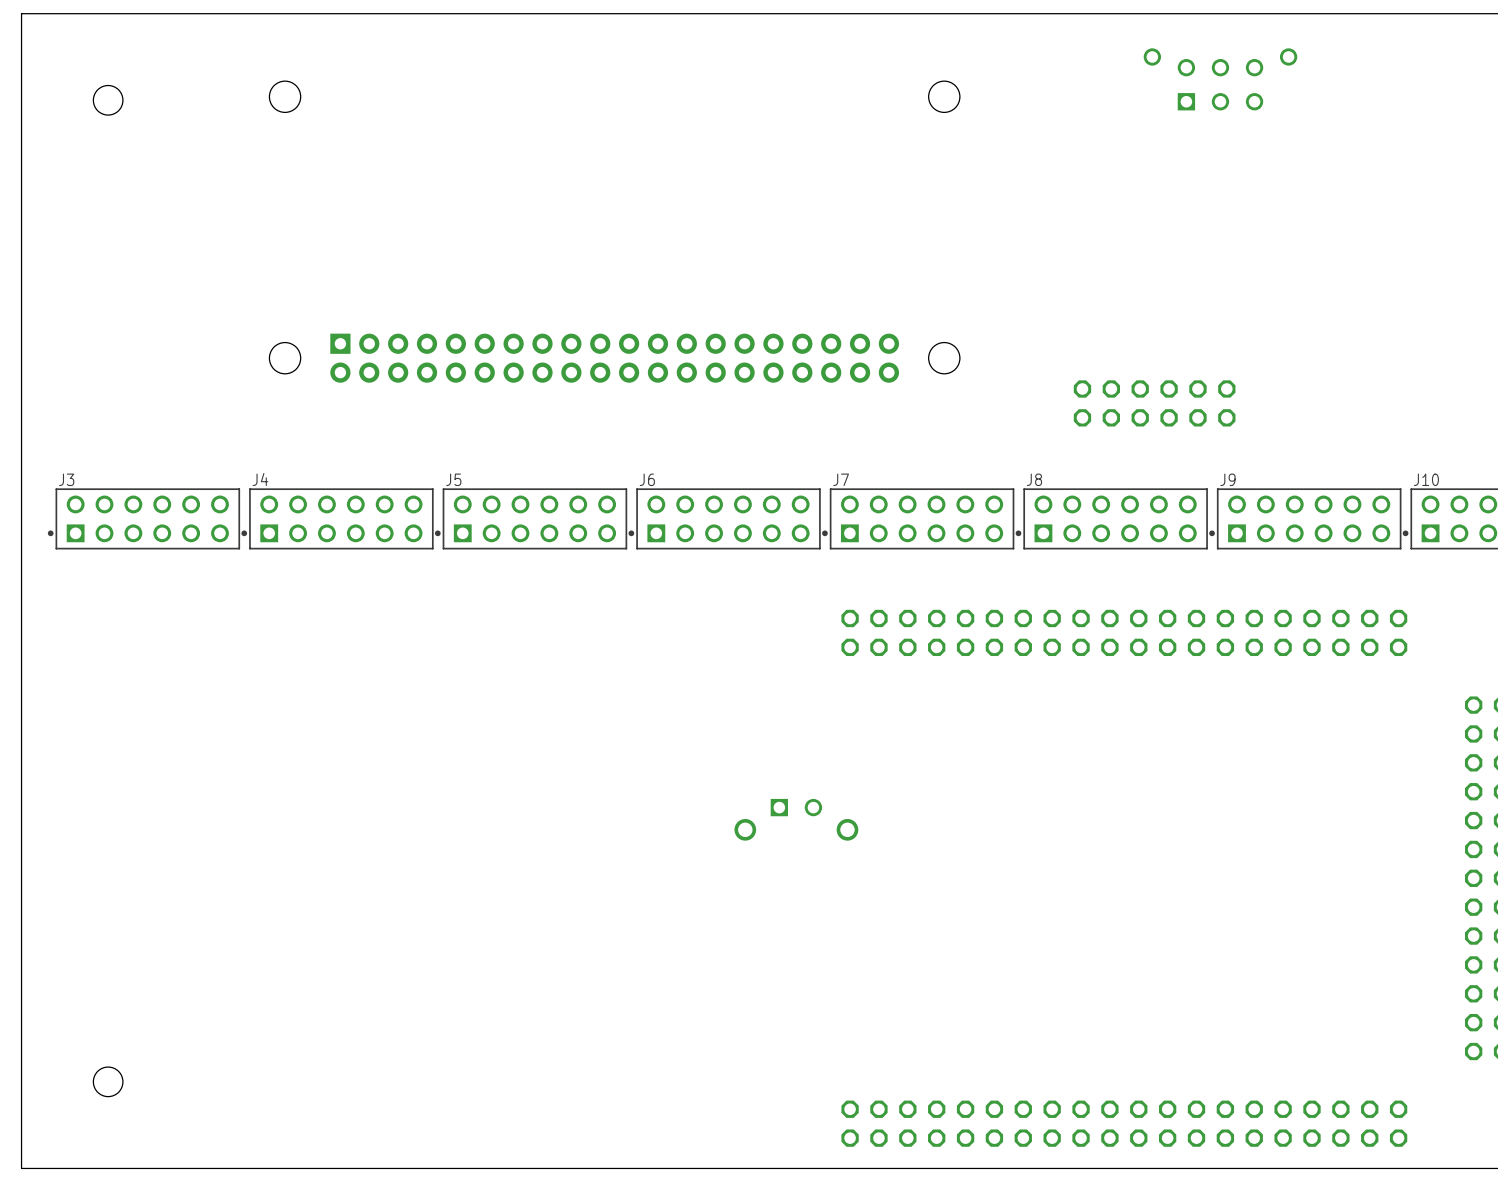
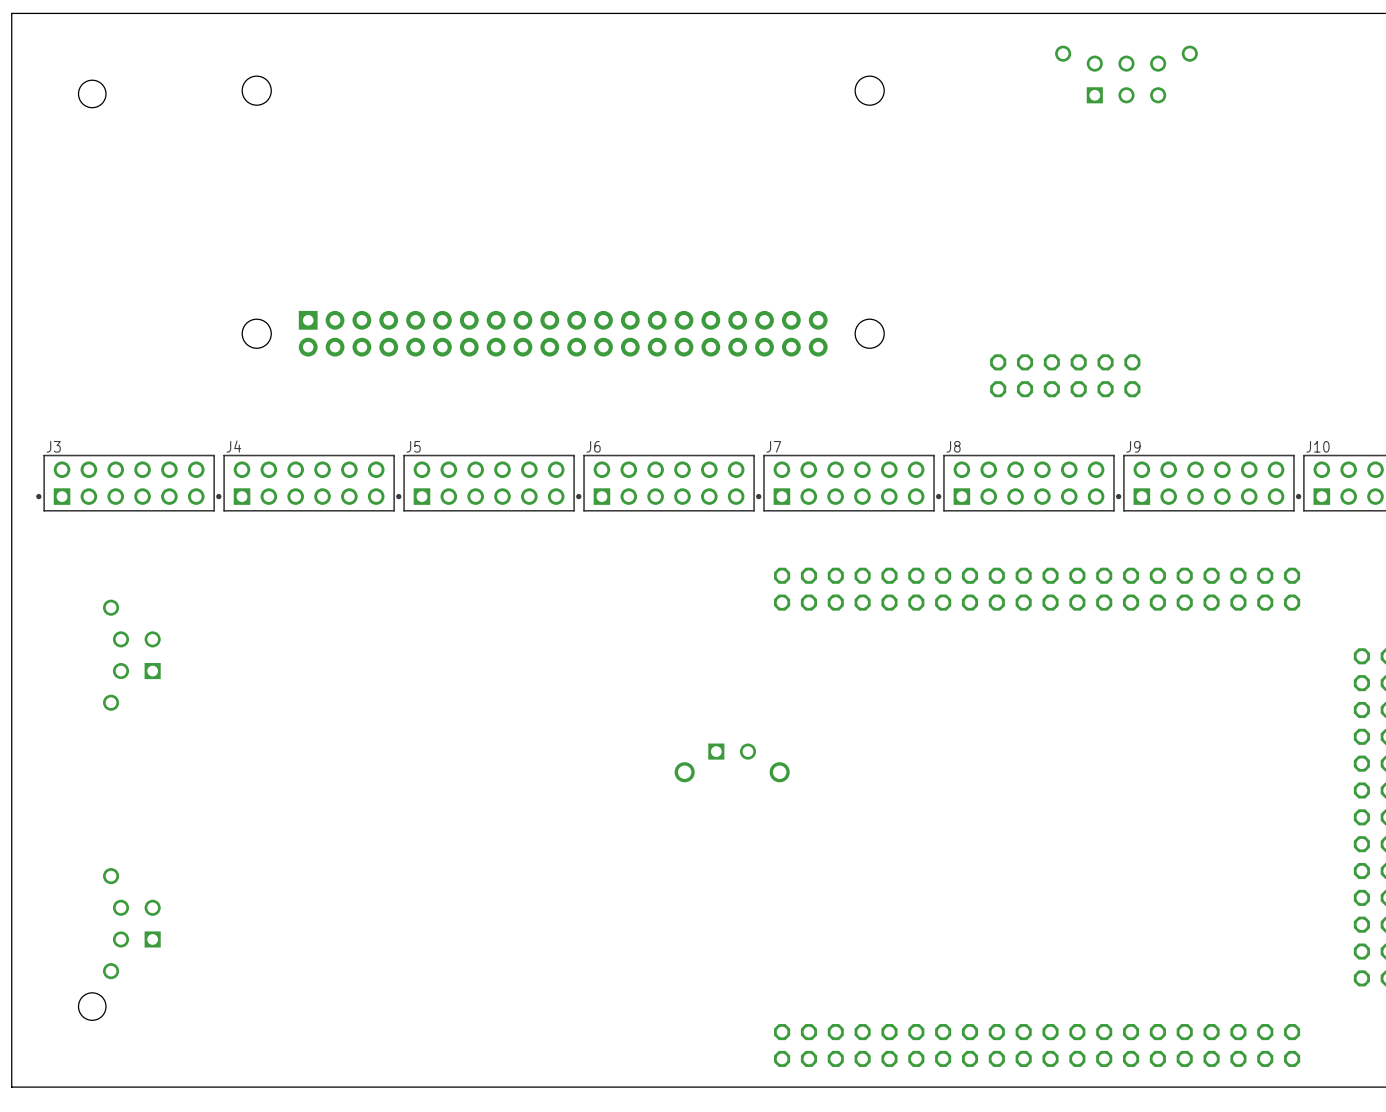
part: none -> (131, 655)
part: none -> (131, 923)

